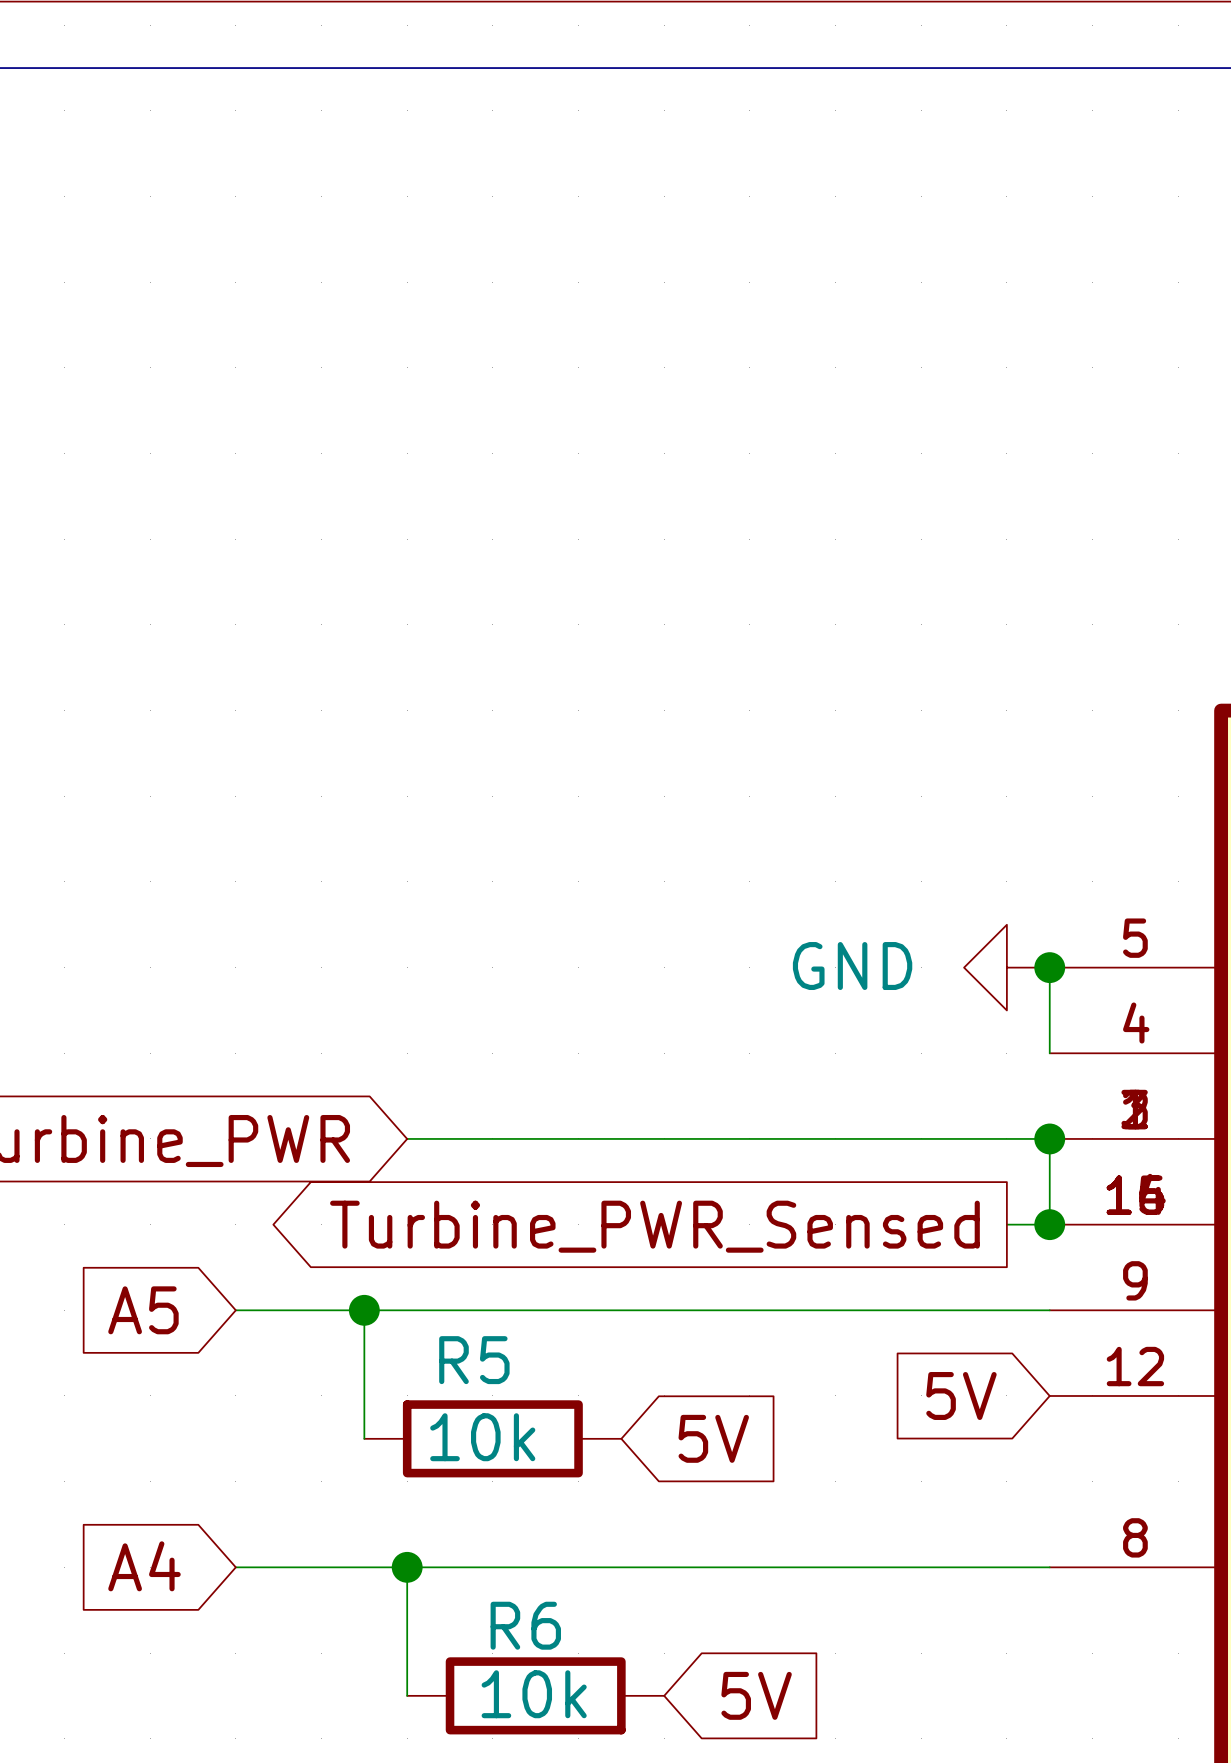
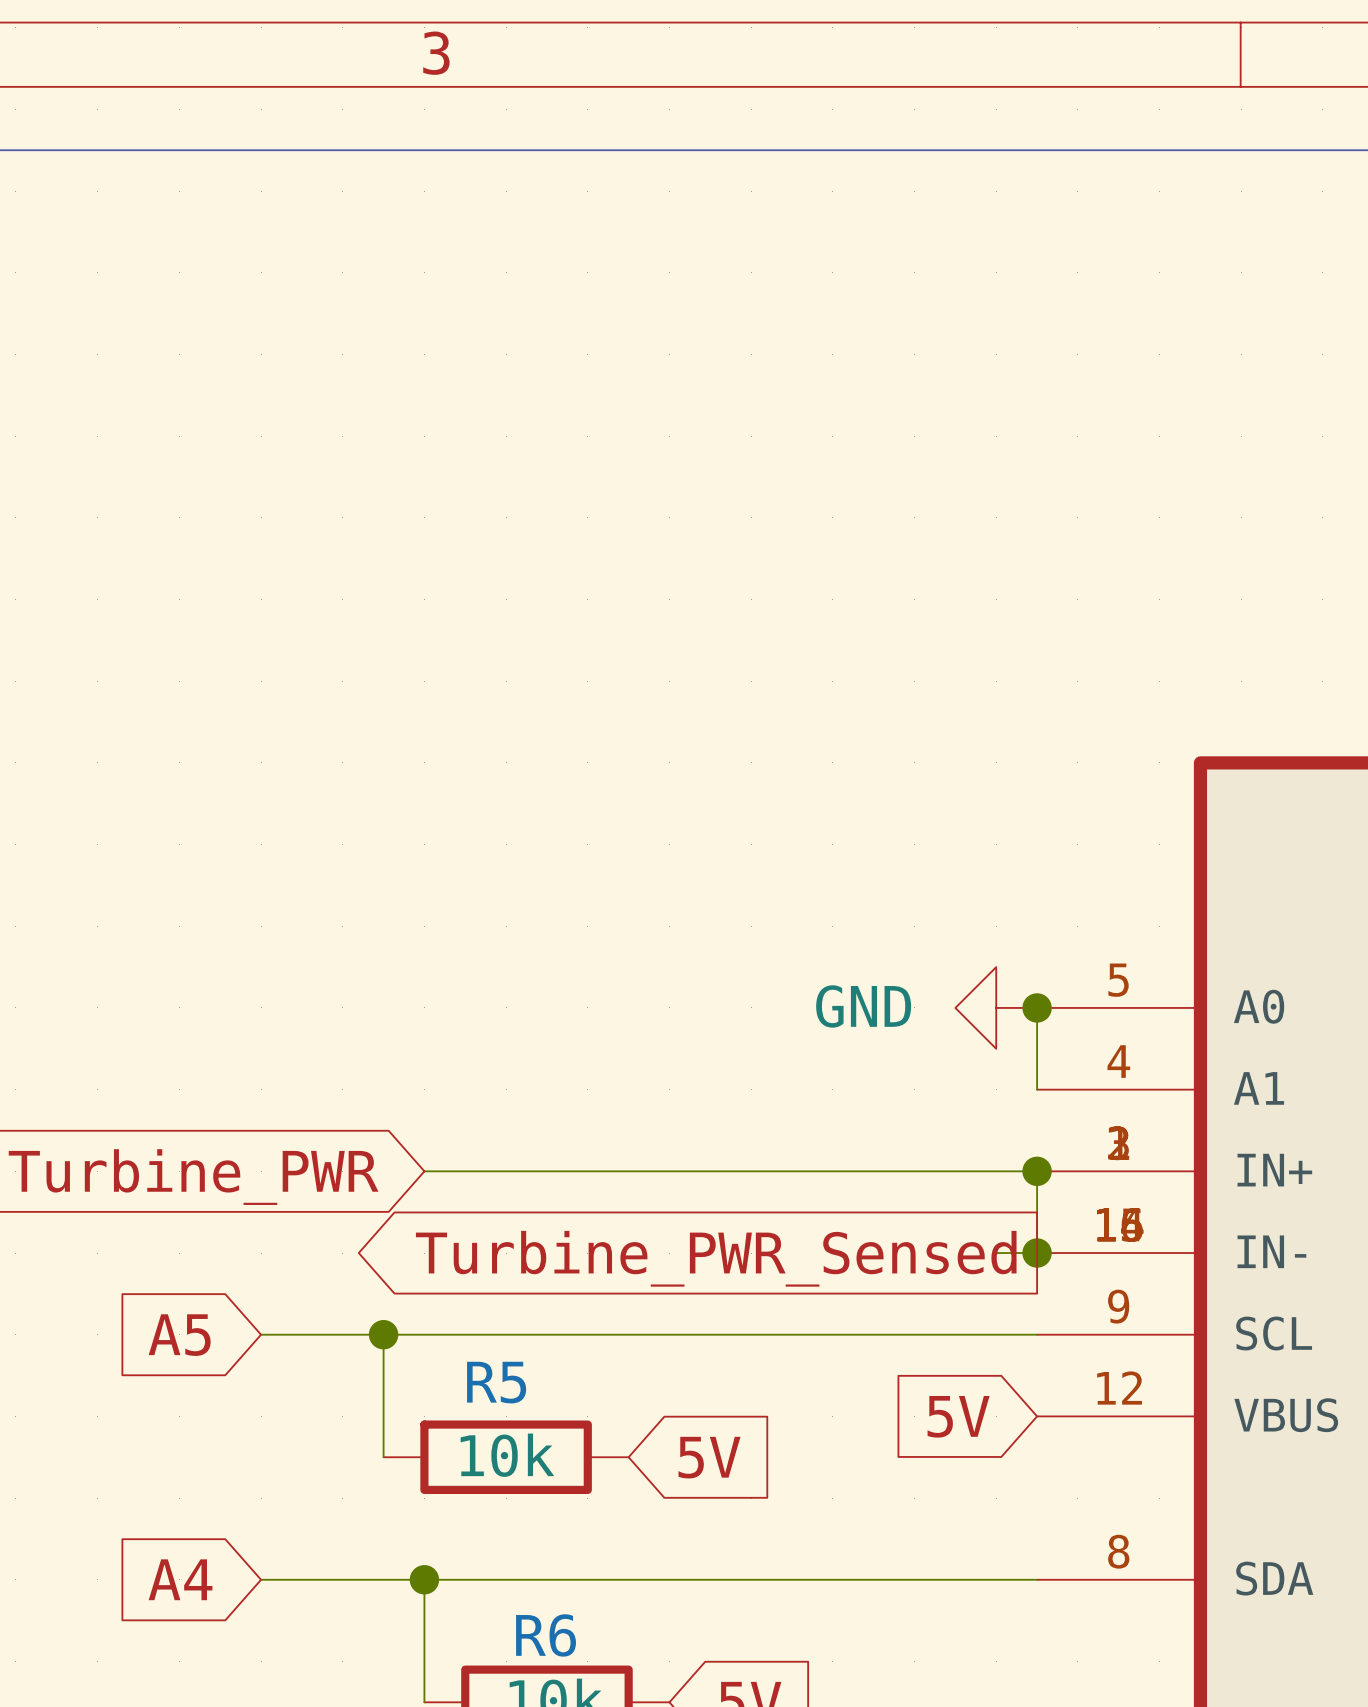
global label position: Turbine_PWR_Sensed (654, 1226) -> Turbine_PWR_Sensed (716, 1258)

